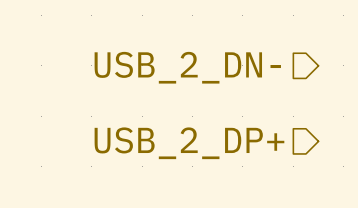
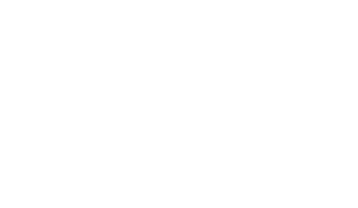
hierarchical label: USB_2_DN- (187, 67) -> none
hierarchical label: USB_2_DP+ (189, 143) -> none

